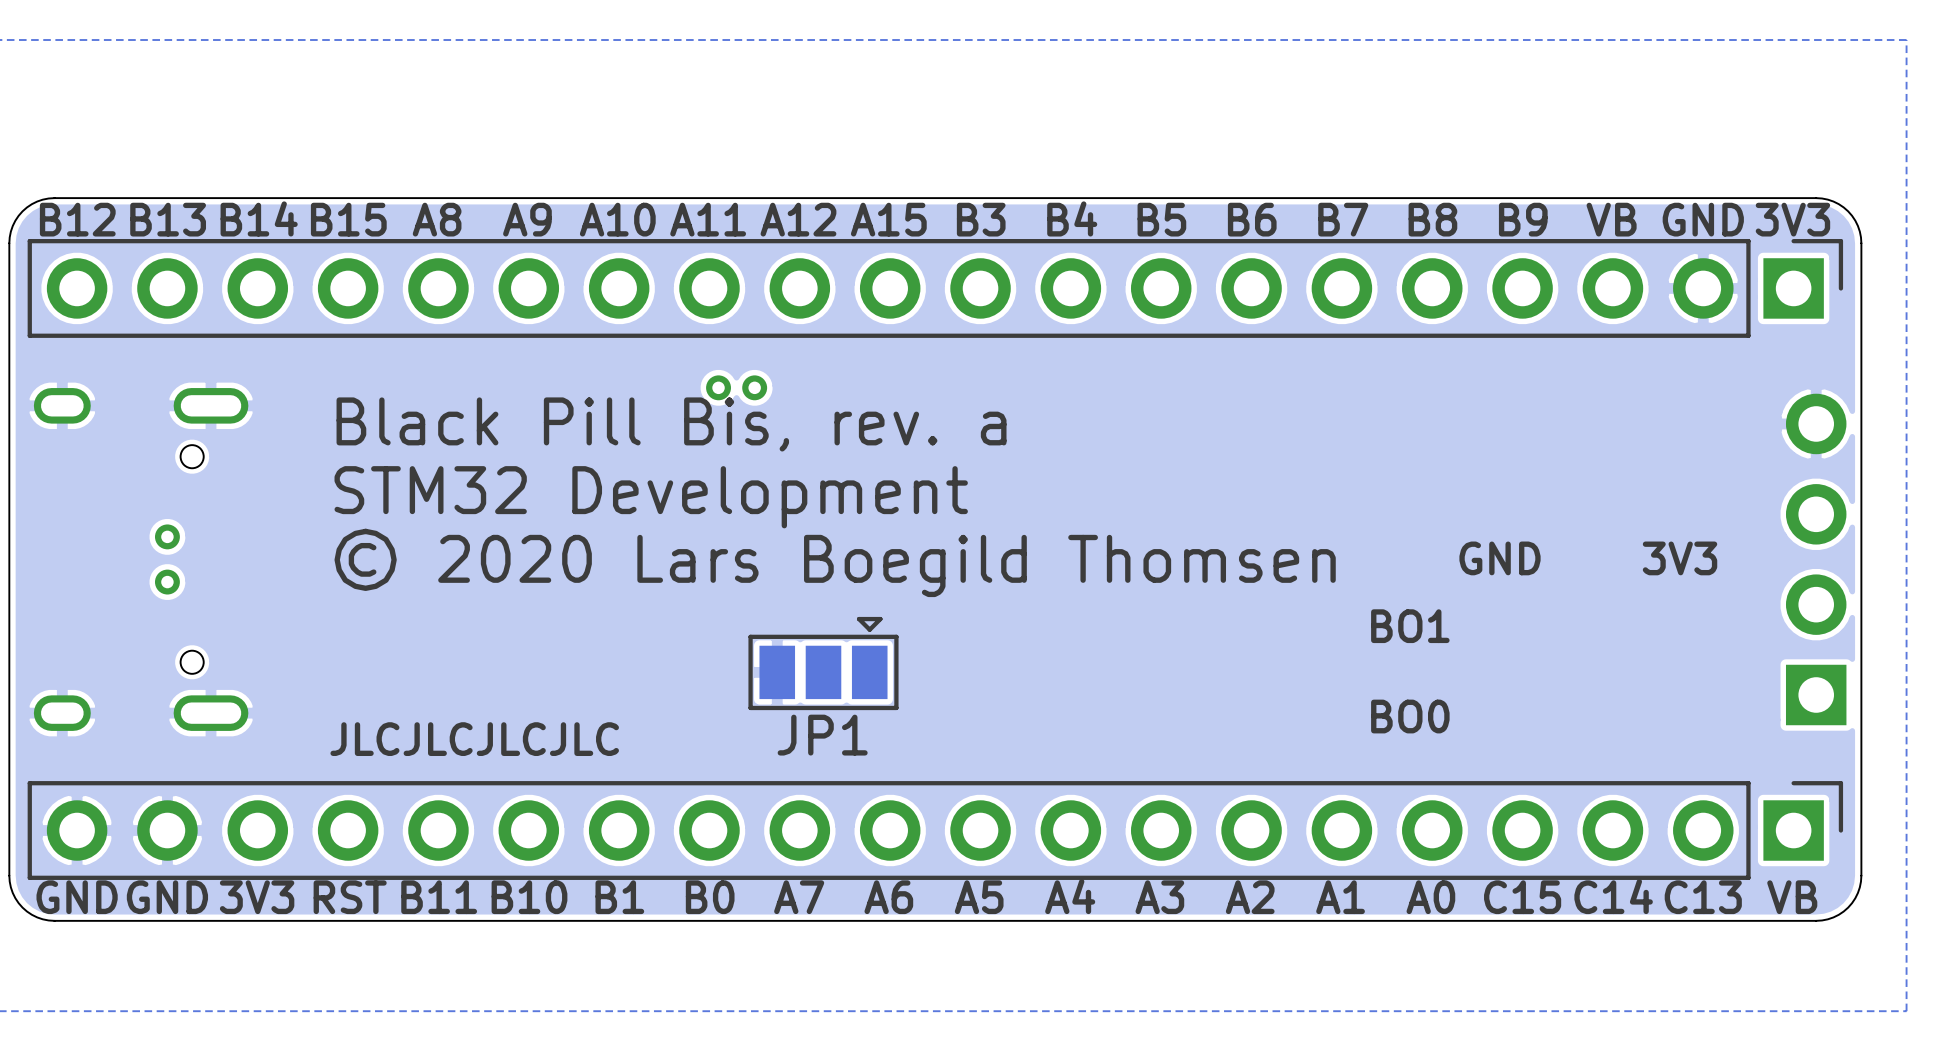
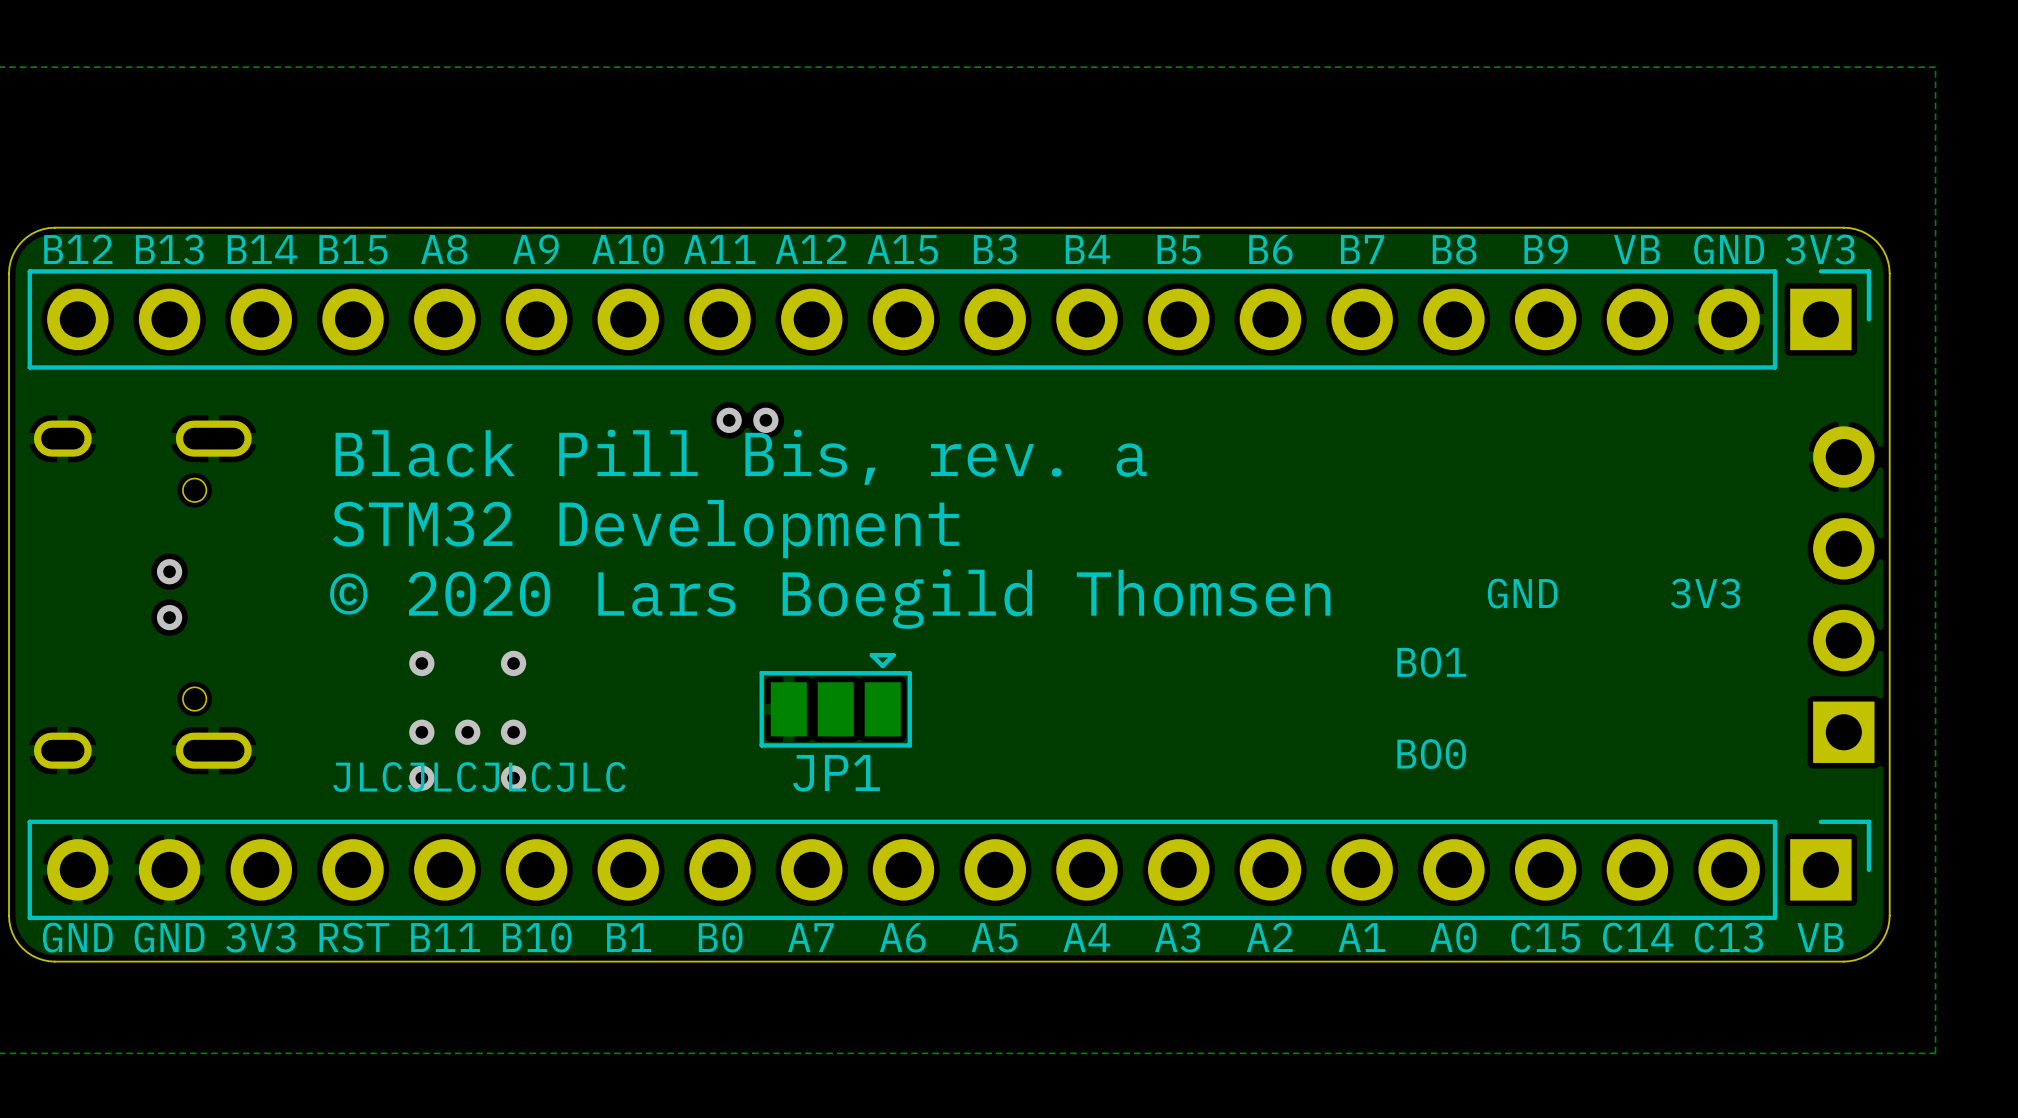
via: none -> (421, 663)
via: none -> (513, 663)
via: none -> (421, 732)
via: none -> (467, 732)
via: none -> (513, 732)
via: none -> (421, 778)
via: none -> (513, 778)

